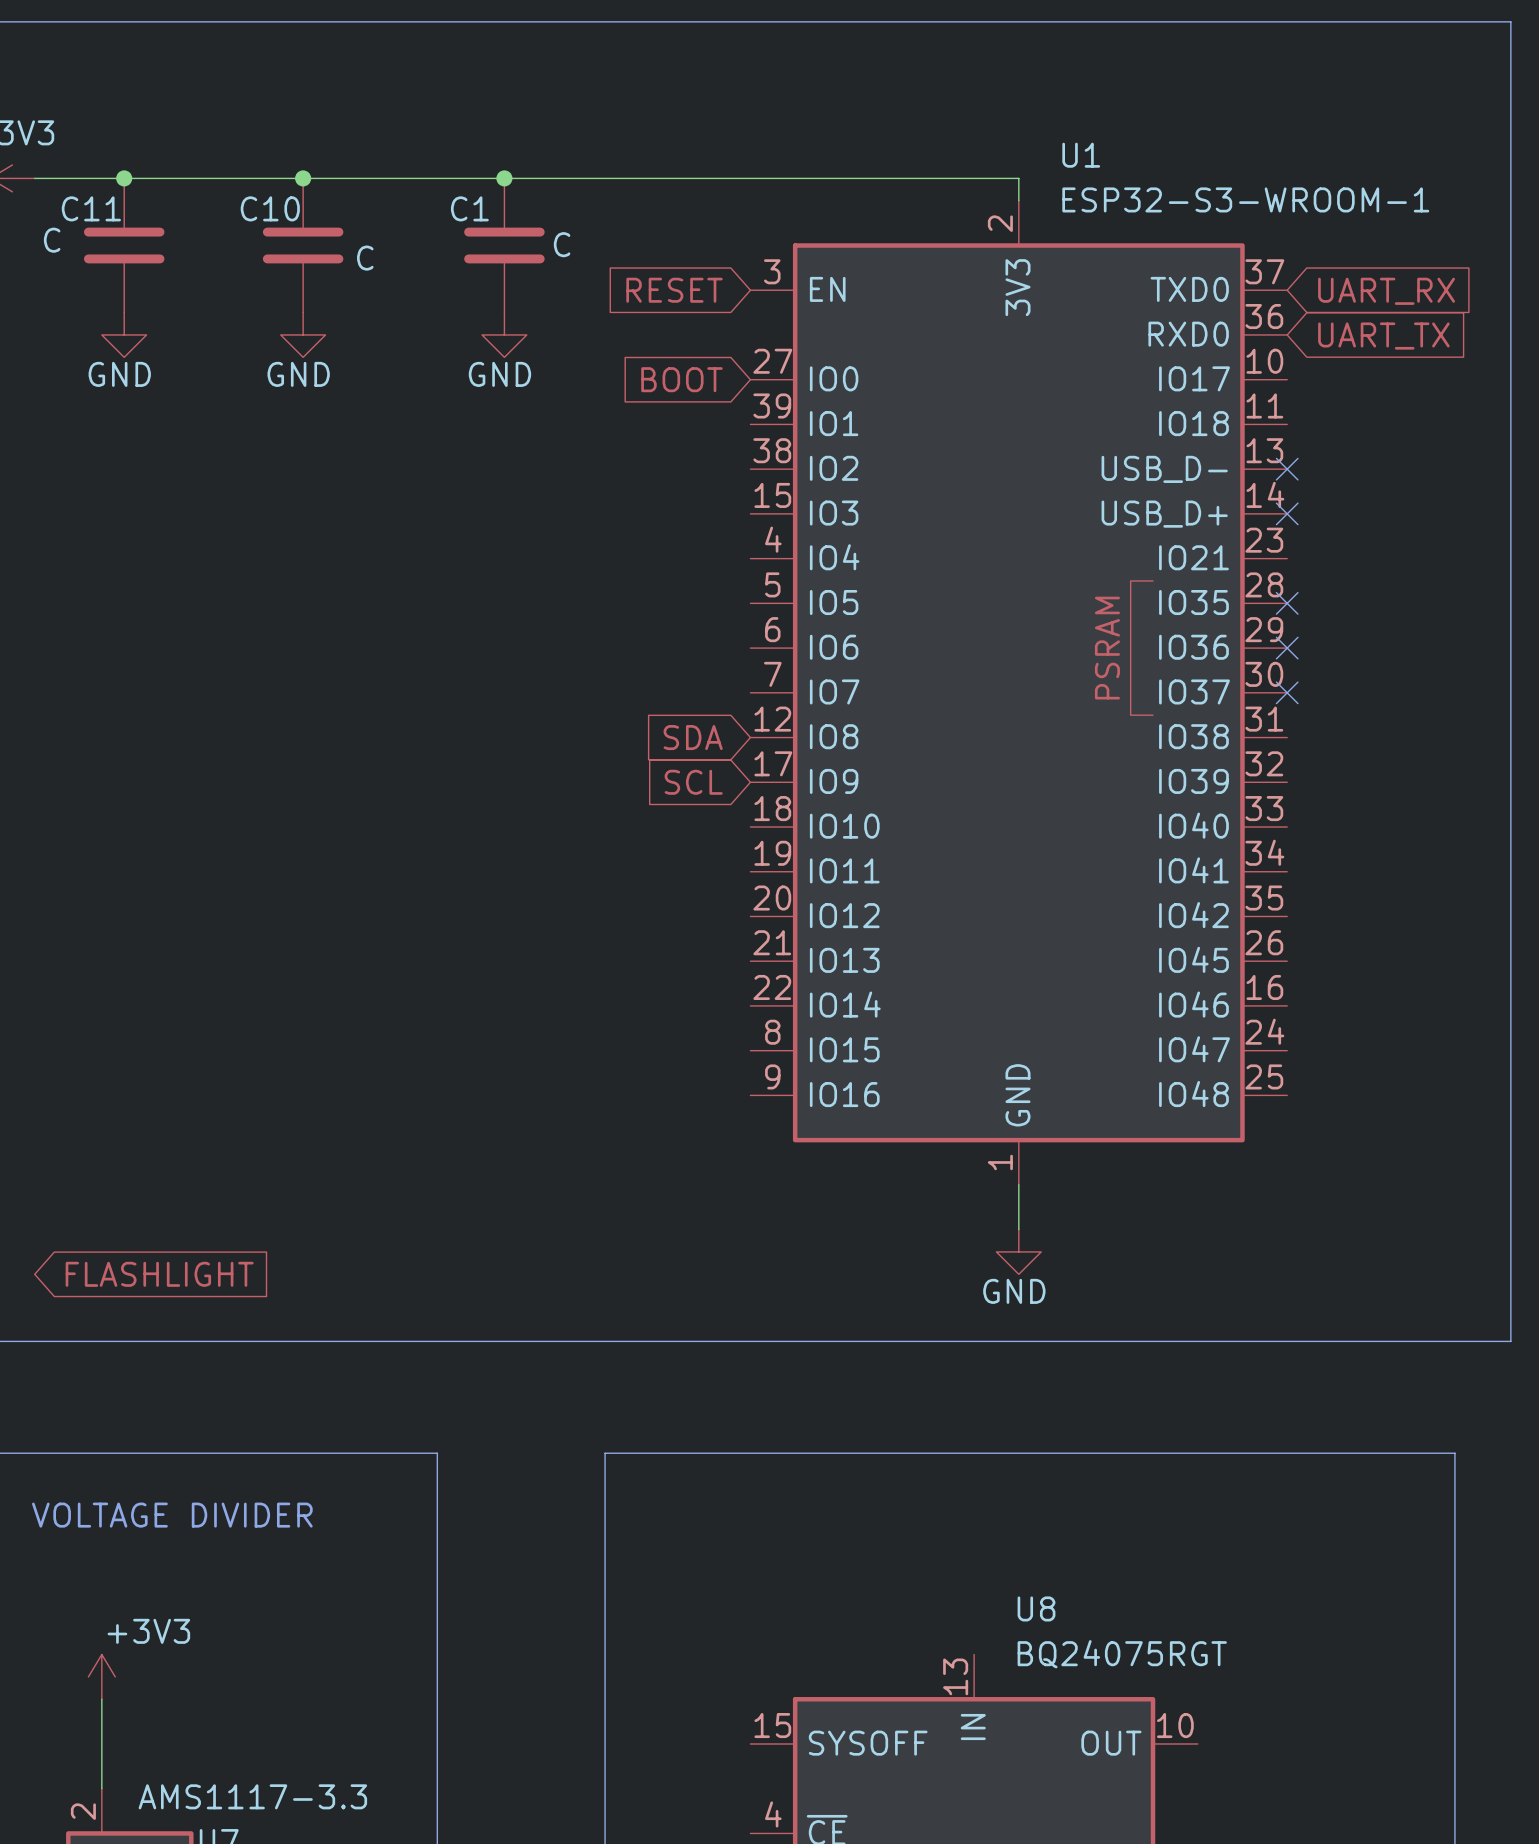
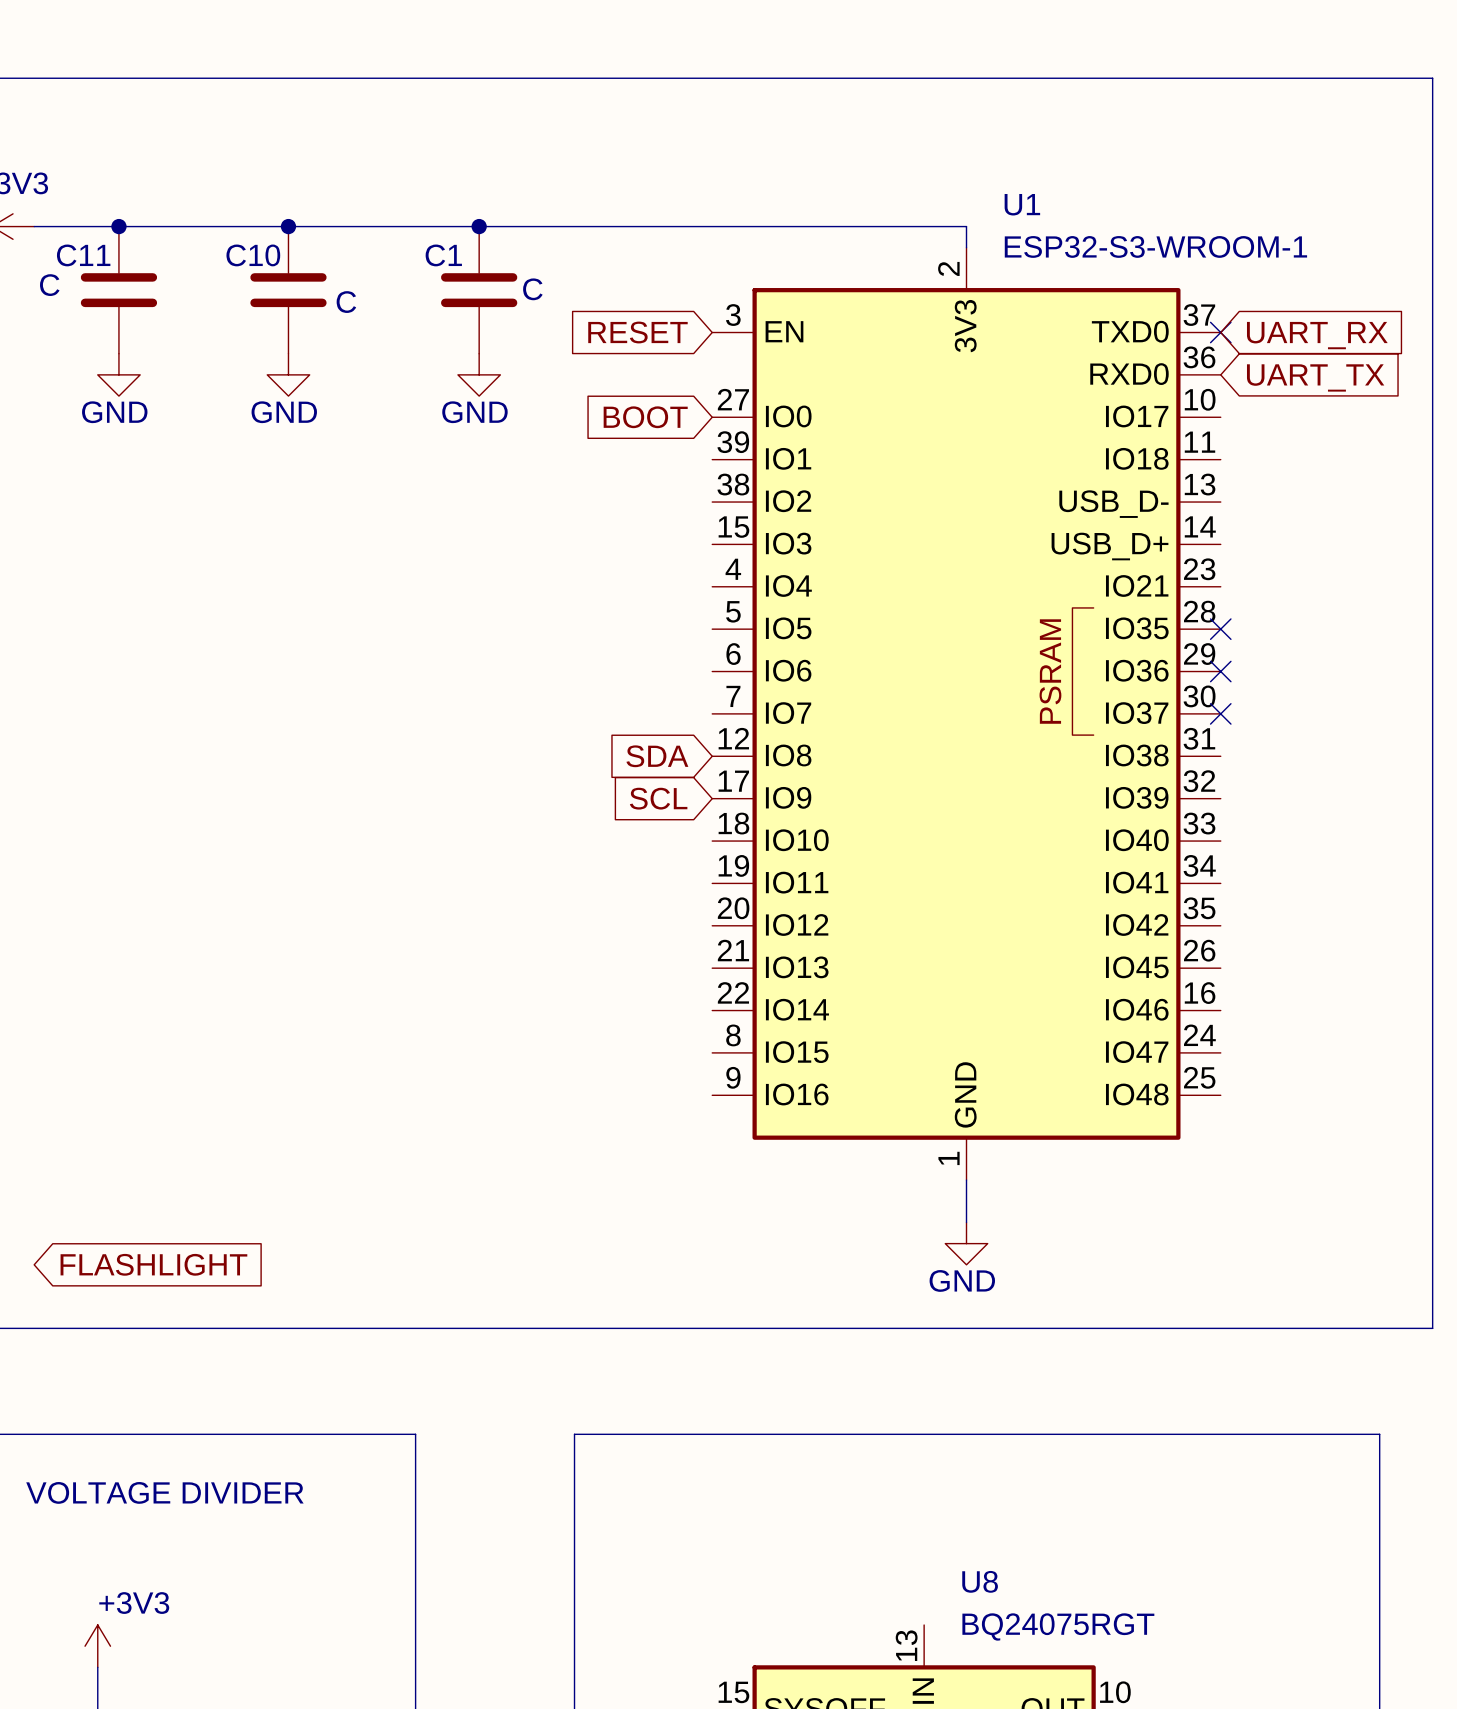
no-connect mark: none -> (1220, 332)
no-connect mark: (1287, 469) -> none
no-connect mark: (1287, 513) -> none

